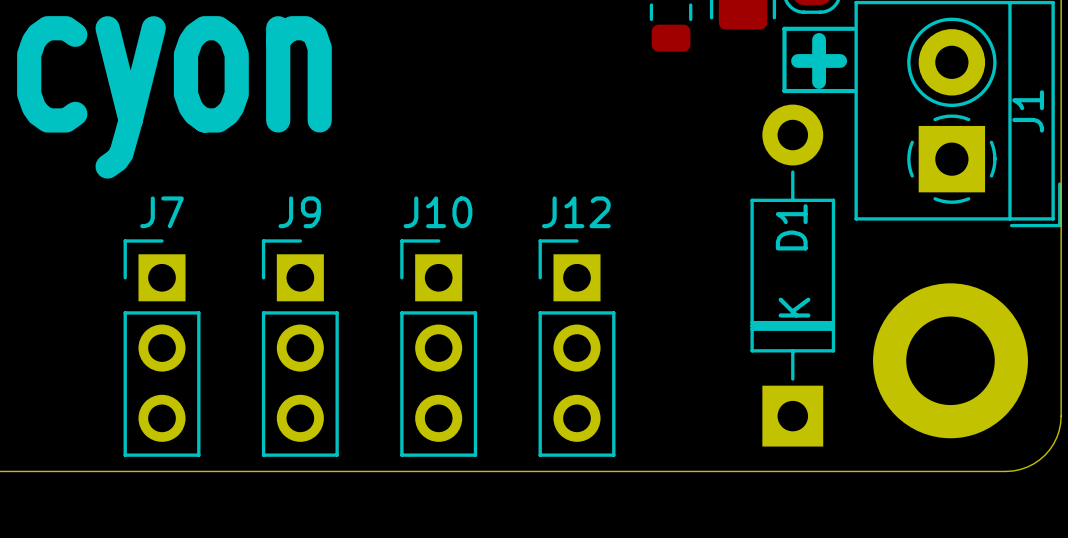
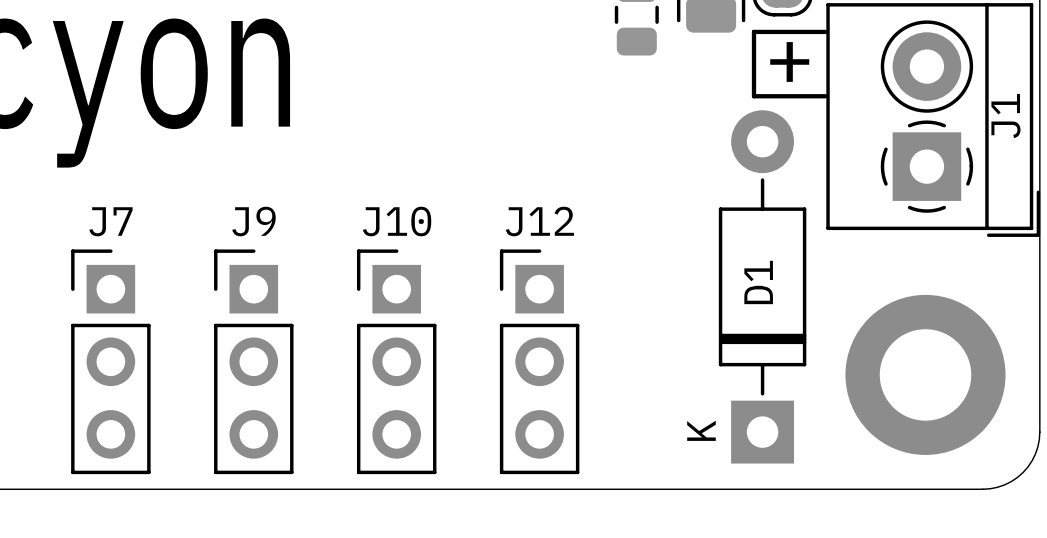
D1 name position: D1 (791, 227) -> D1 (758, 282)
D1 text position: K (794, 307) -> K (701, 430)

